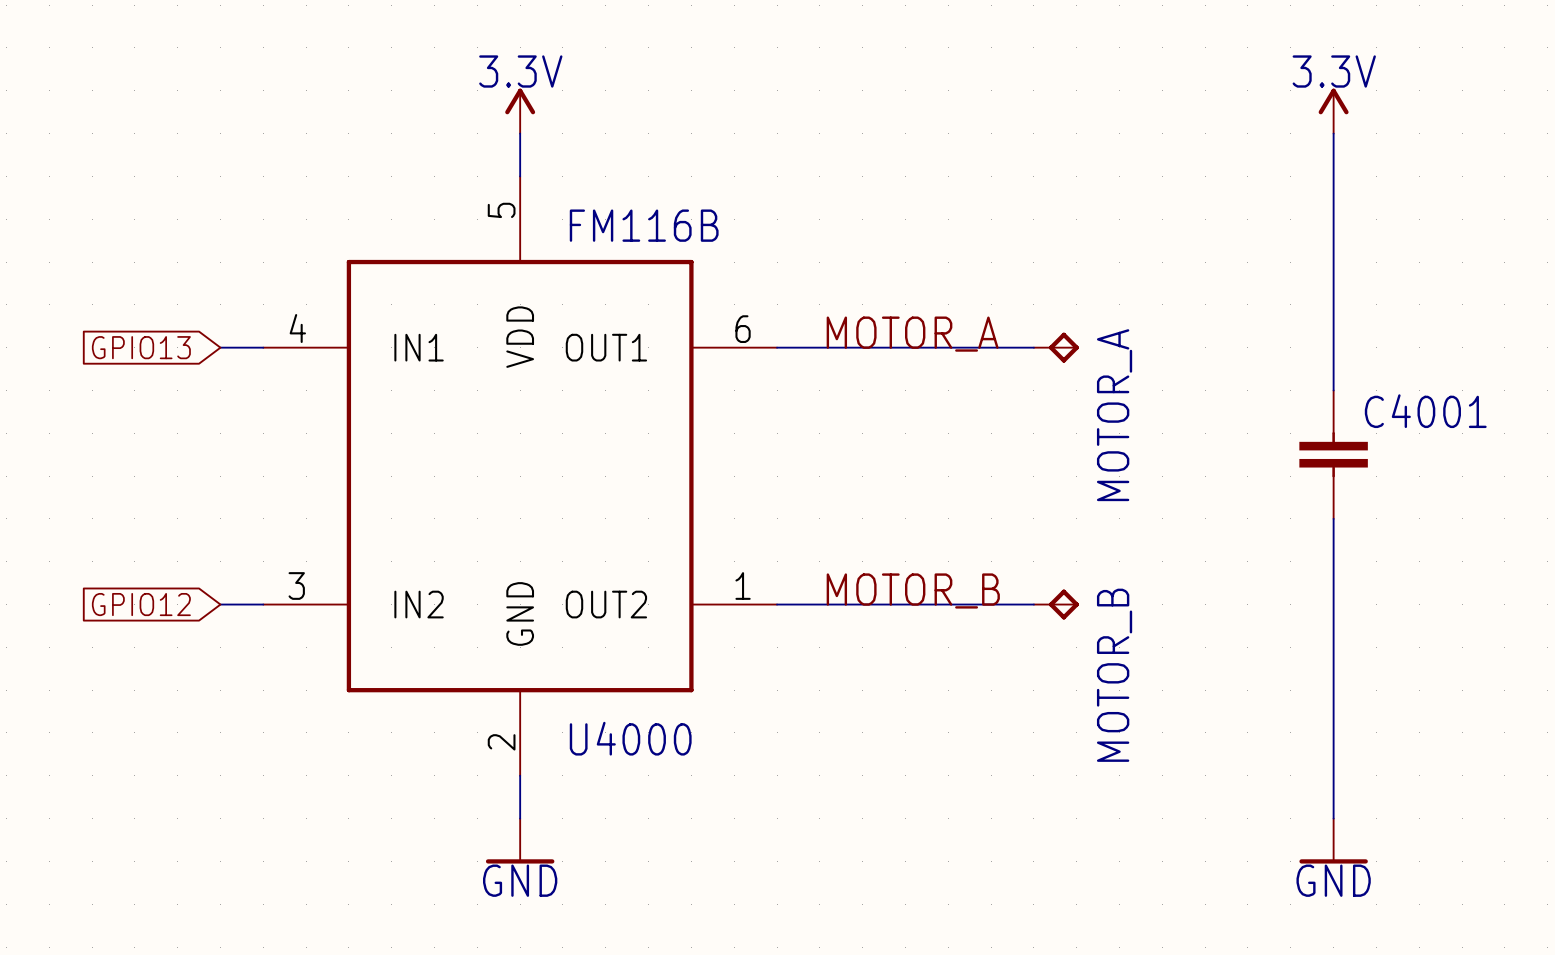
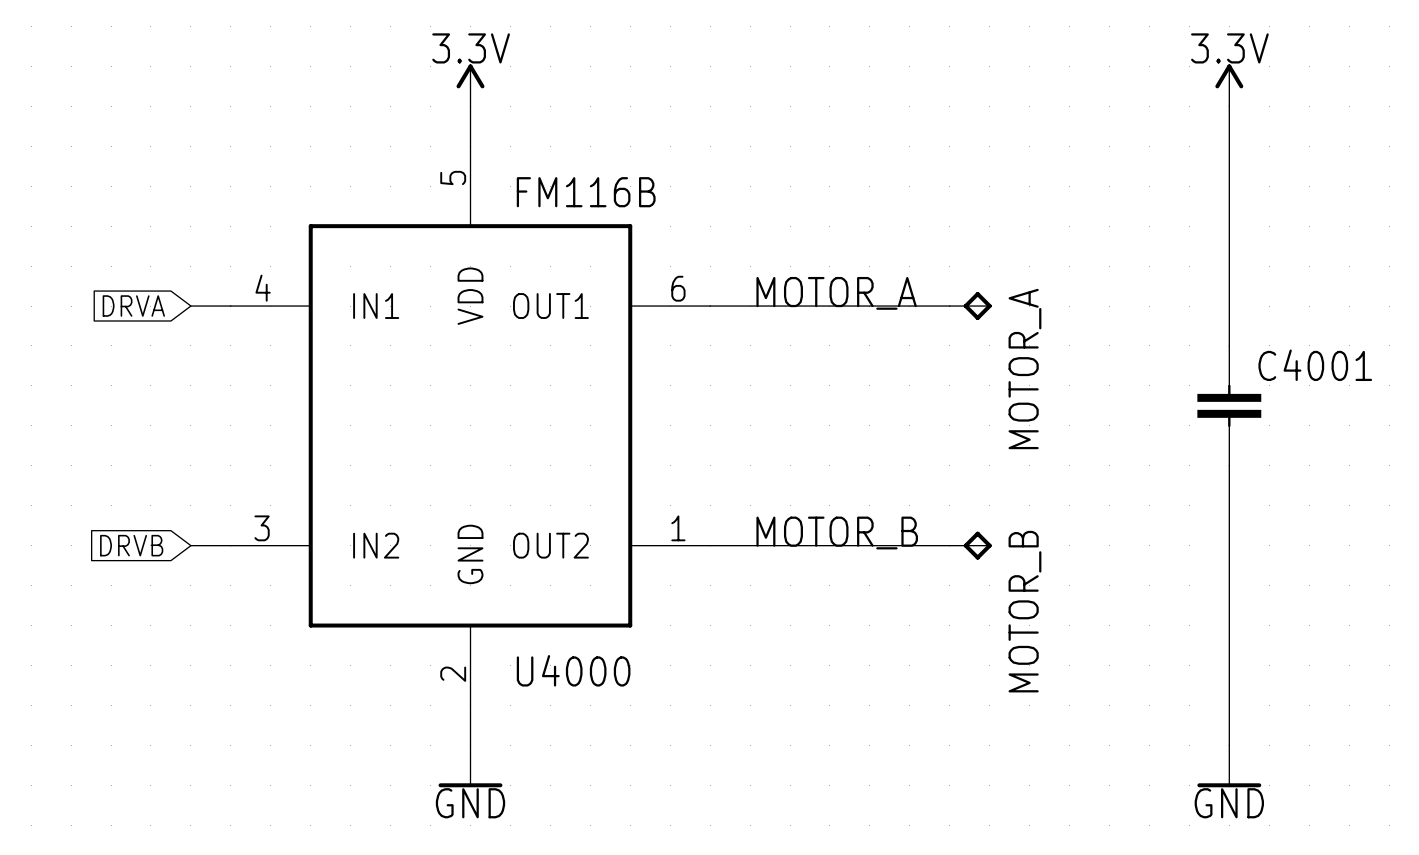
global label: GPIO13 (141, 347) -> DRVA (133, 306)
global label: GPIO12 (141, 604) -> DRVB (131, 545)

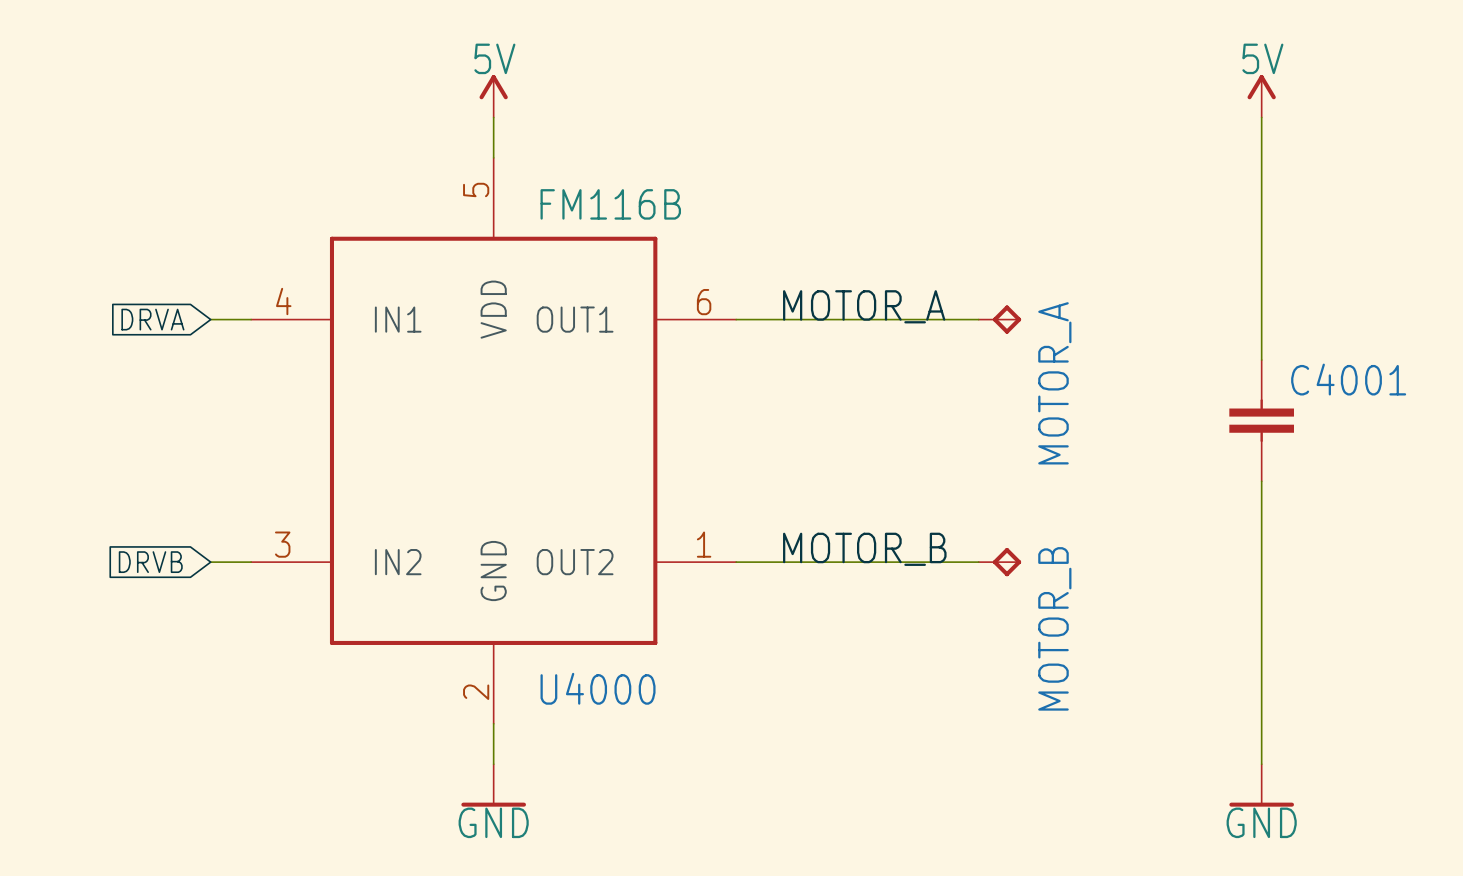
power symbol: 3.3V (470, 85) -> 5V (493, 96)
power symbol: 3.3V (1229, 85) -> 5V (1261, 96)

